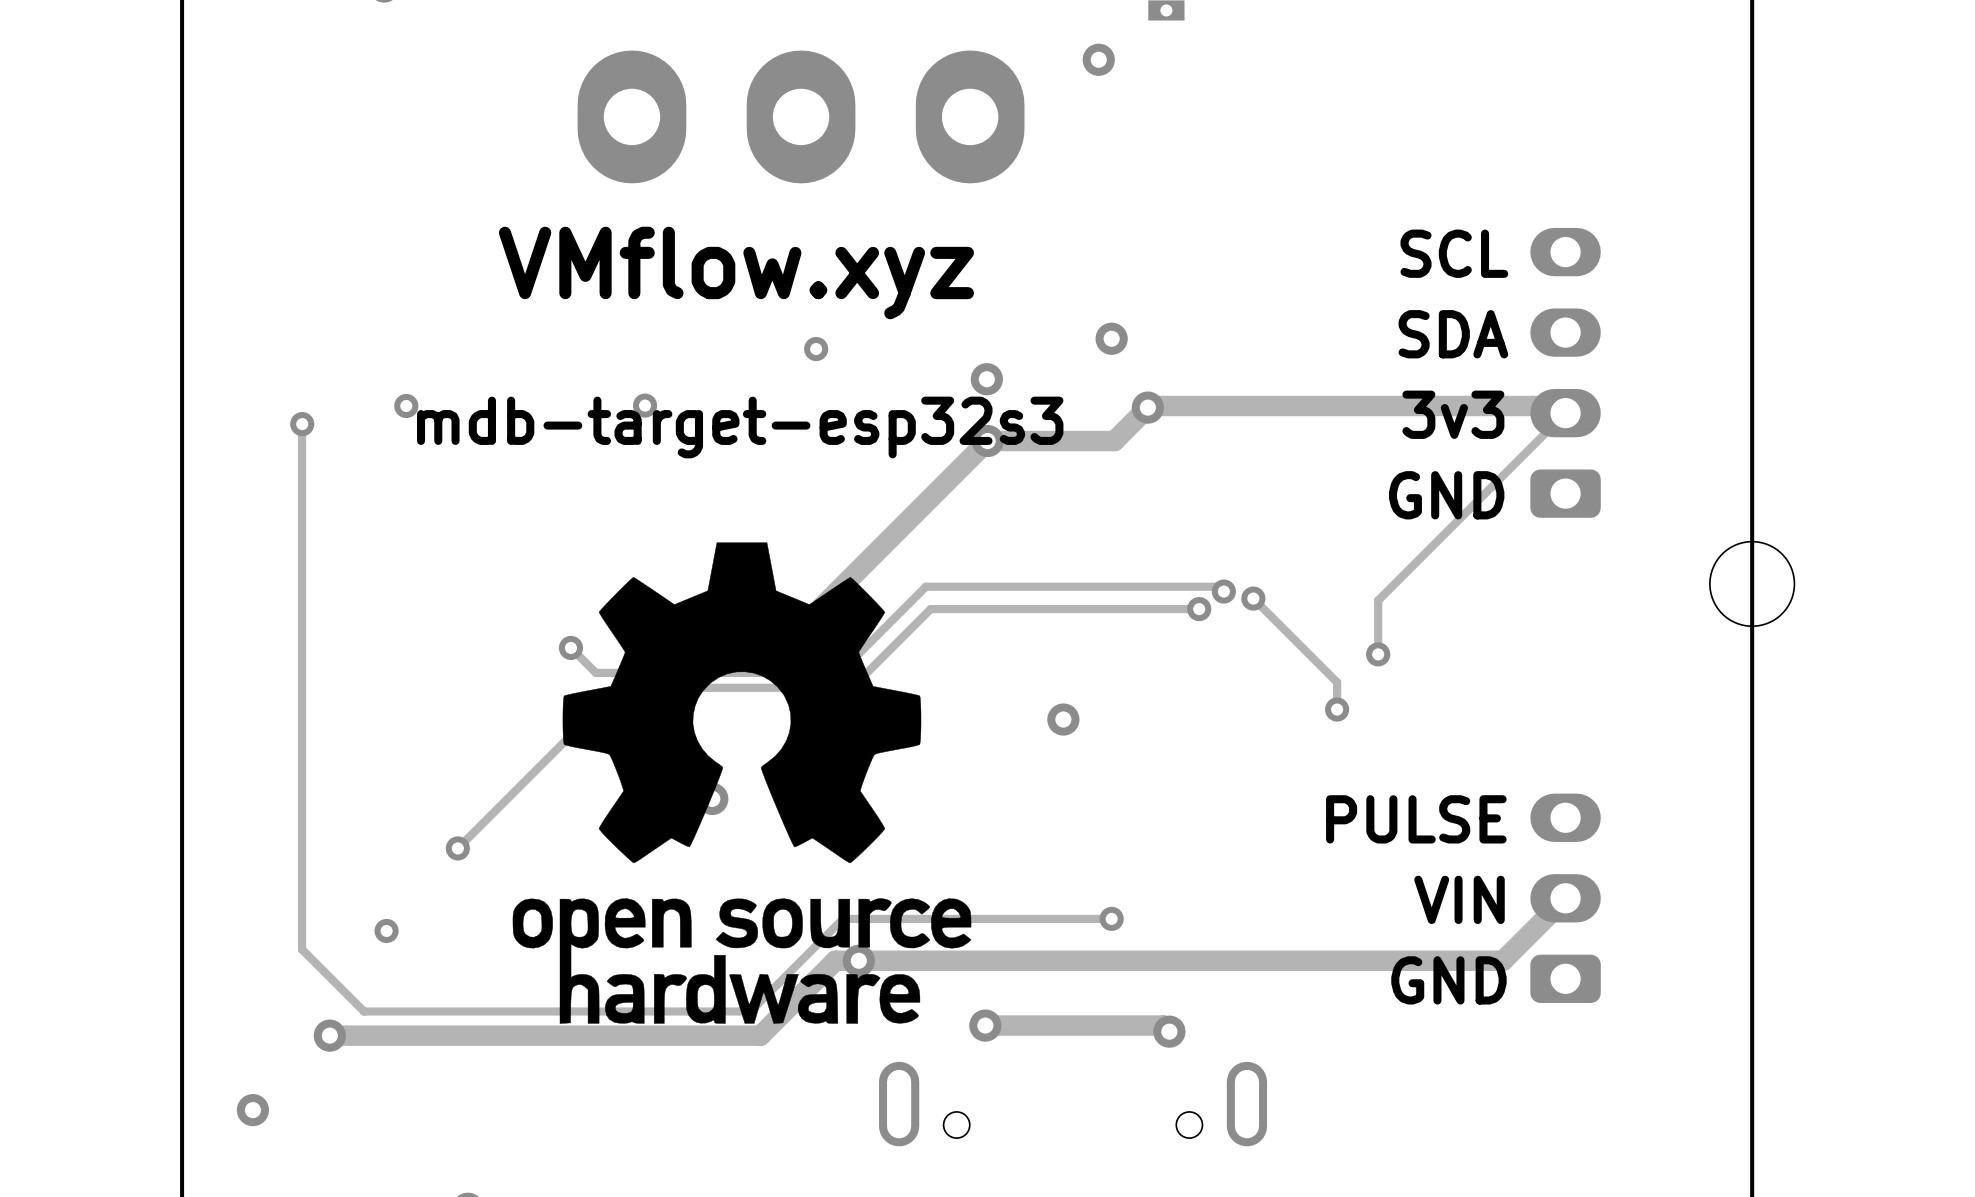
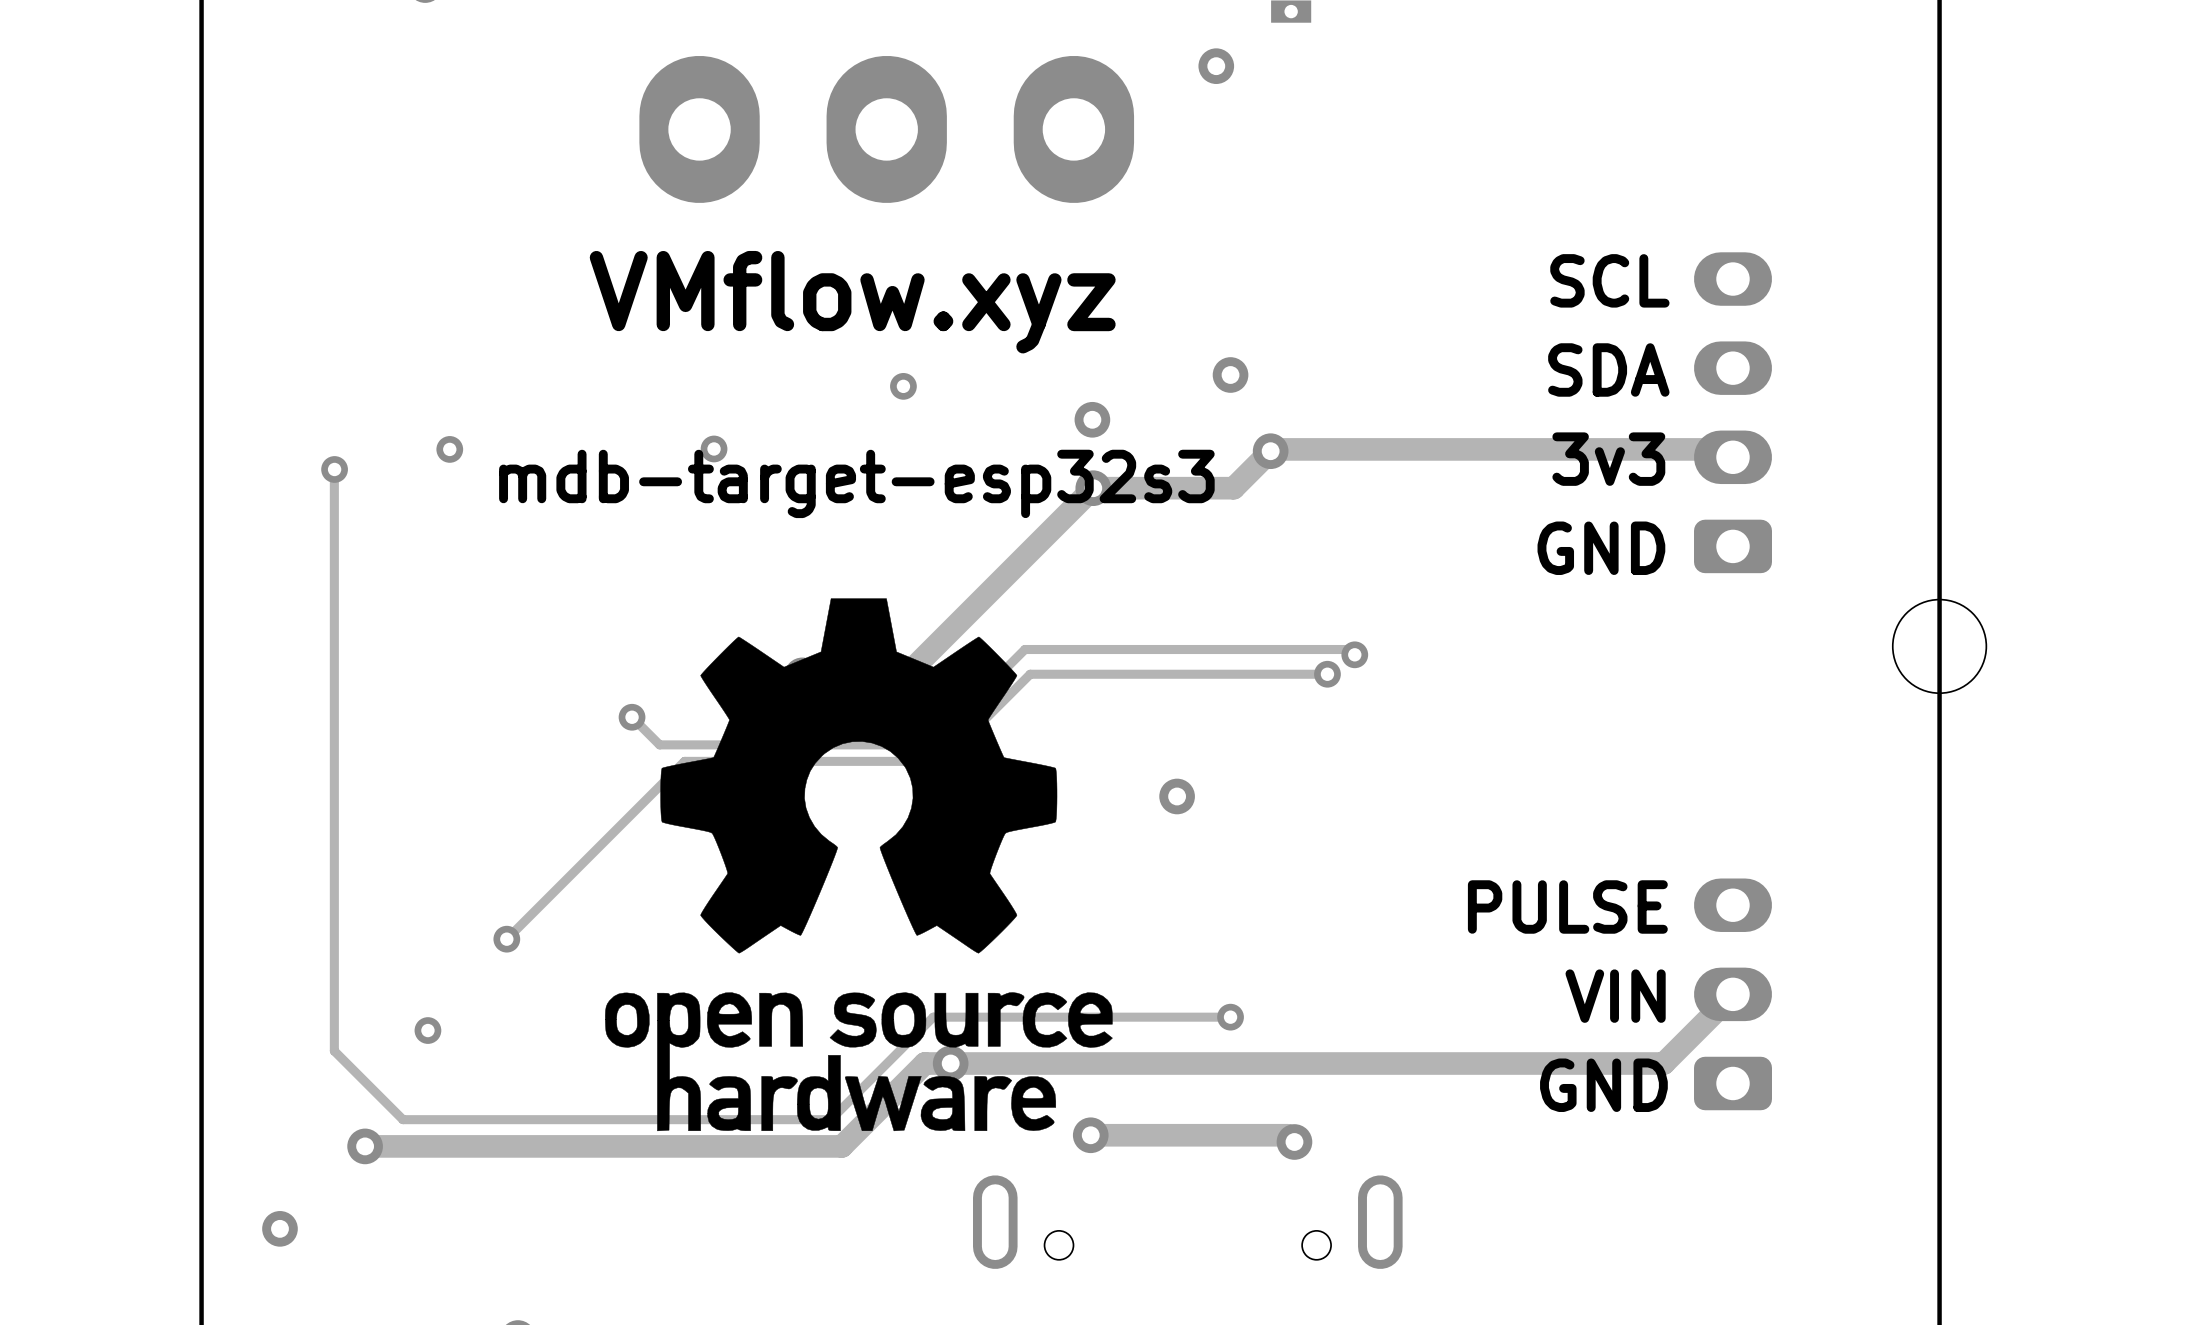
text position: VMflow.xyz (736, 273) -> VMflow.xyz (852, 302)
track: (1565, 413) (1378, 600) (1378, 654) -> none
text position: mdb-target-esp32s3 (740, 427) -> mdb-target-esp32s3 (856, 483)
track: (1253, 598) (1337, 682) (1337, 709) -> none
via: (1253, 598) -> none
via: (1378, 654) -> none
via: (1337, 709) -> none
drawing position: (742, 783) -> (858, 864)

